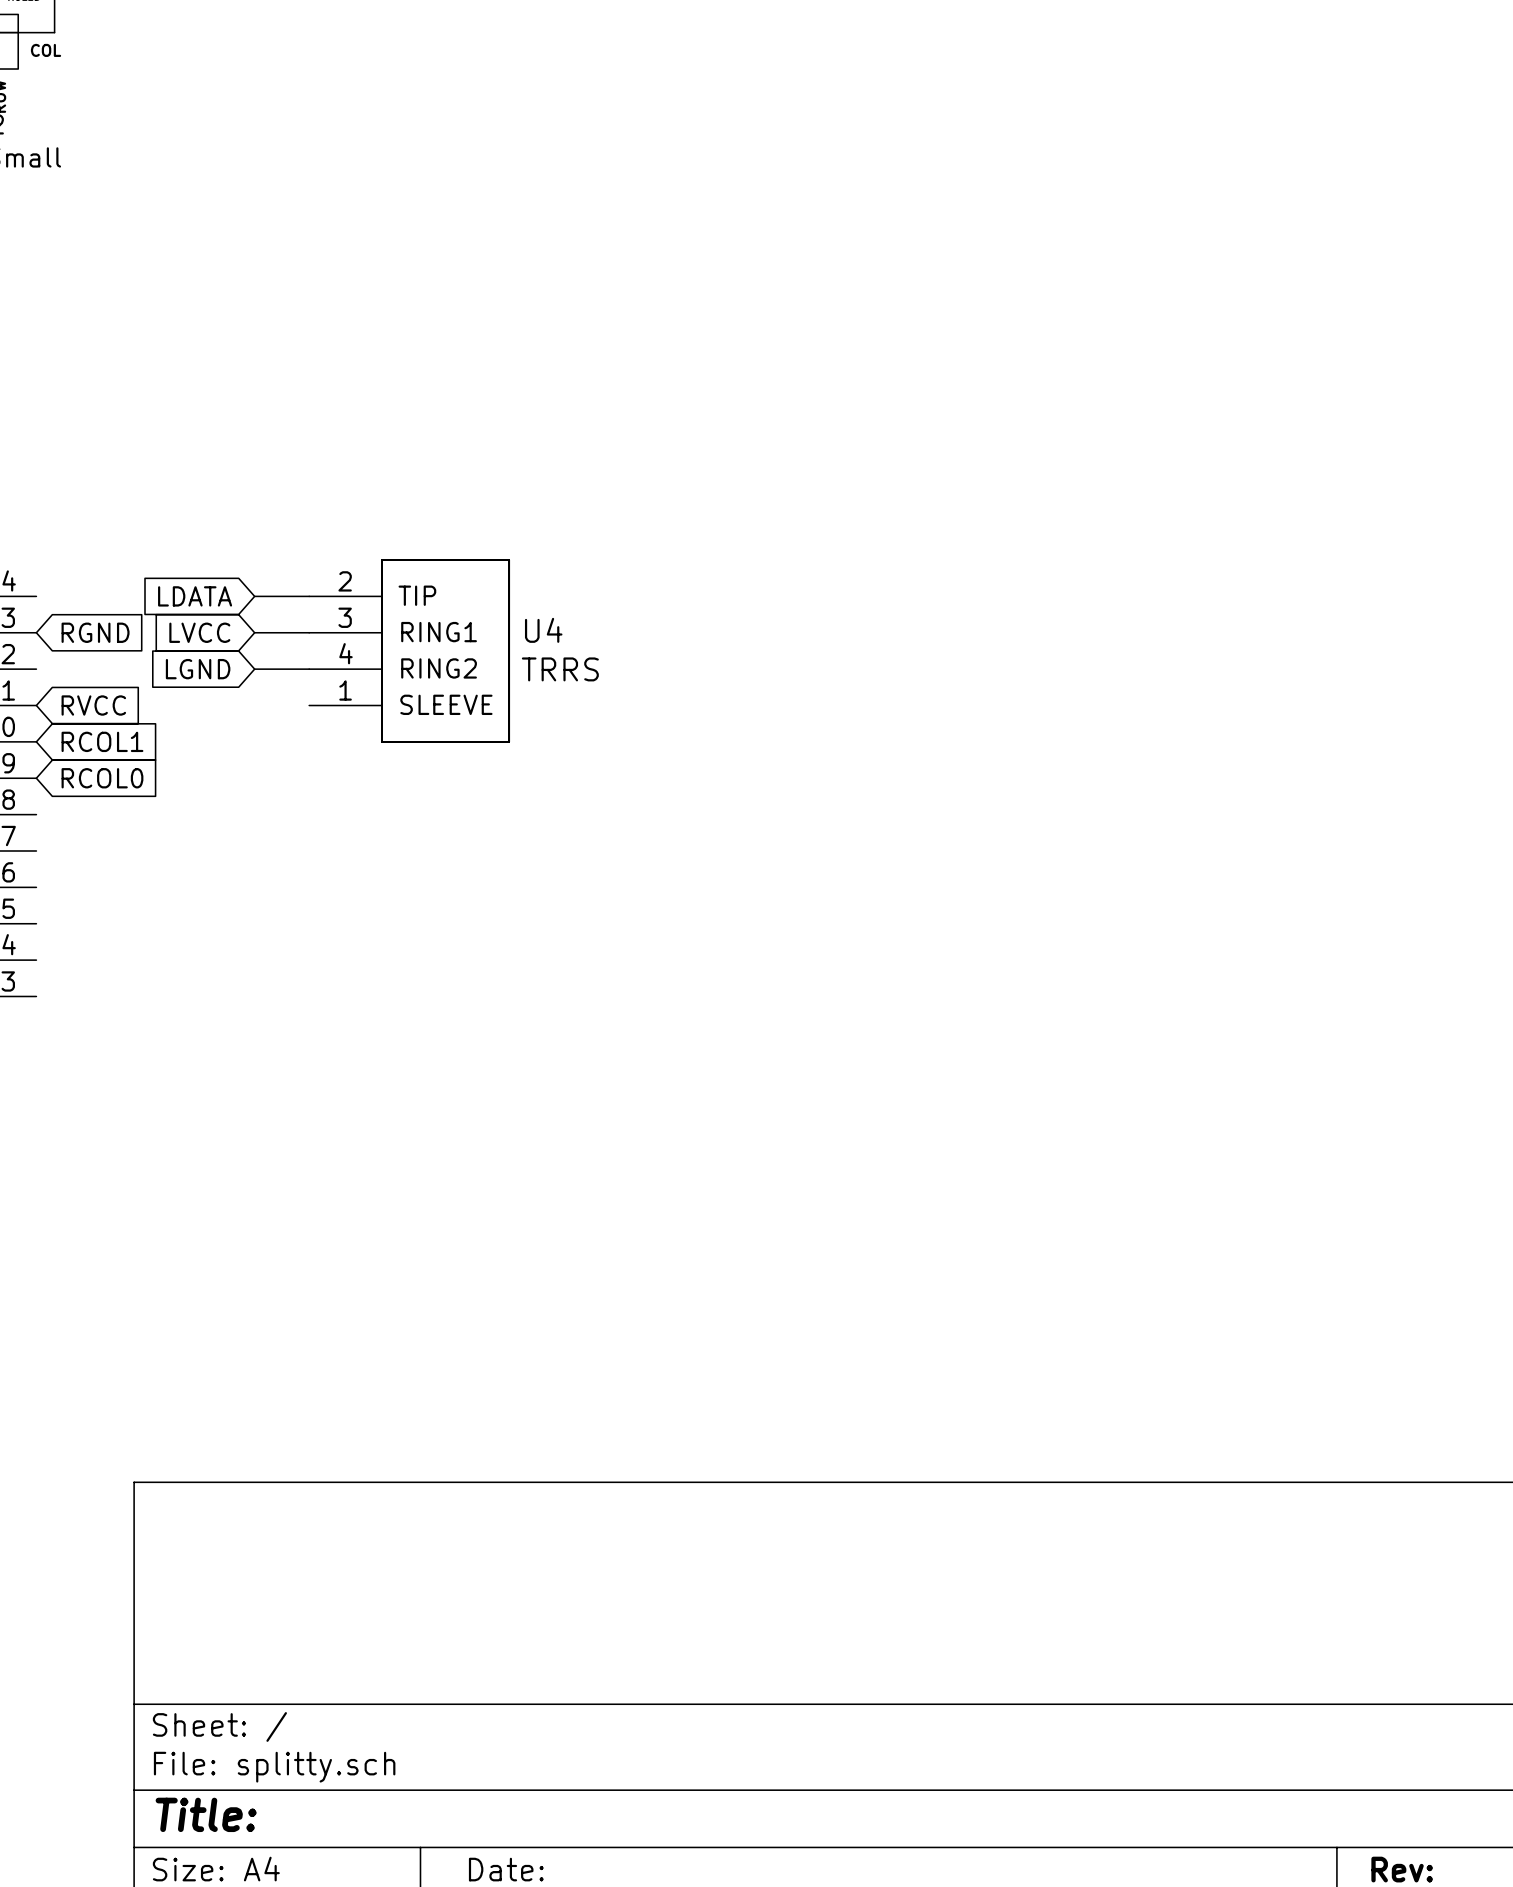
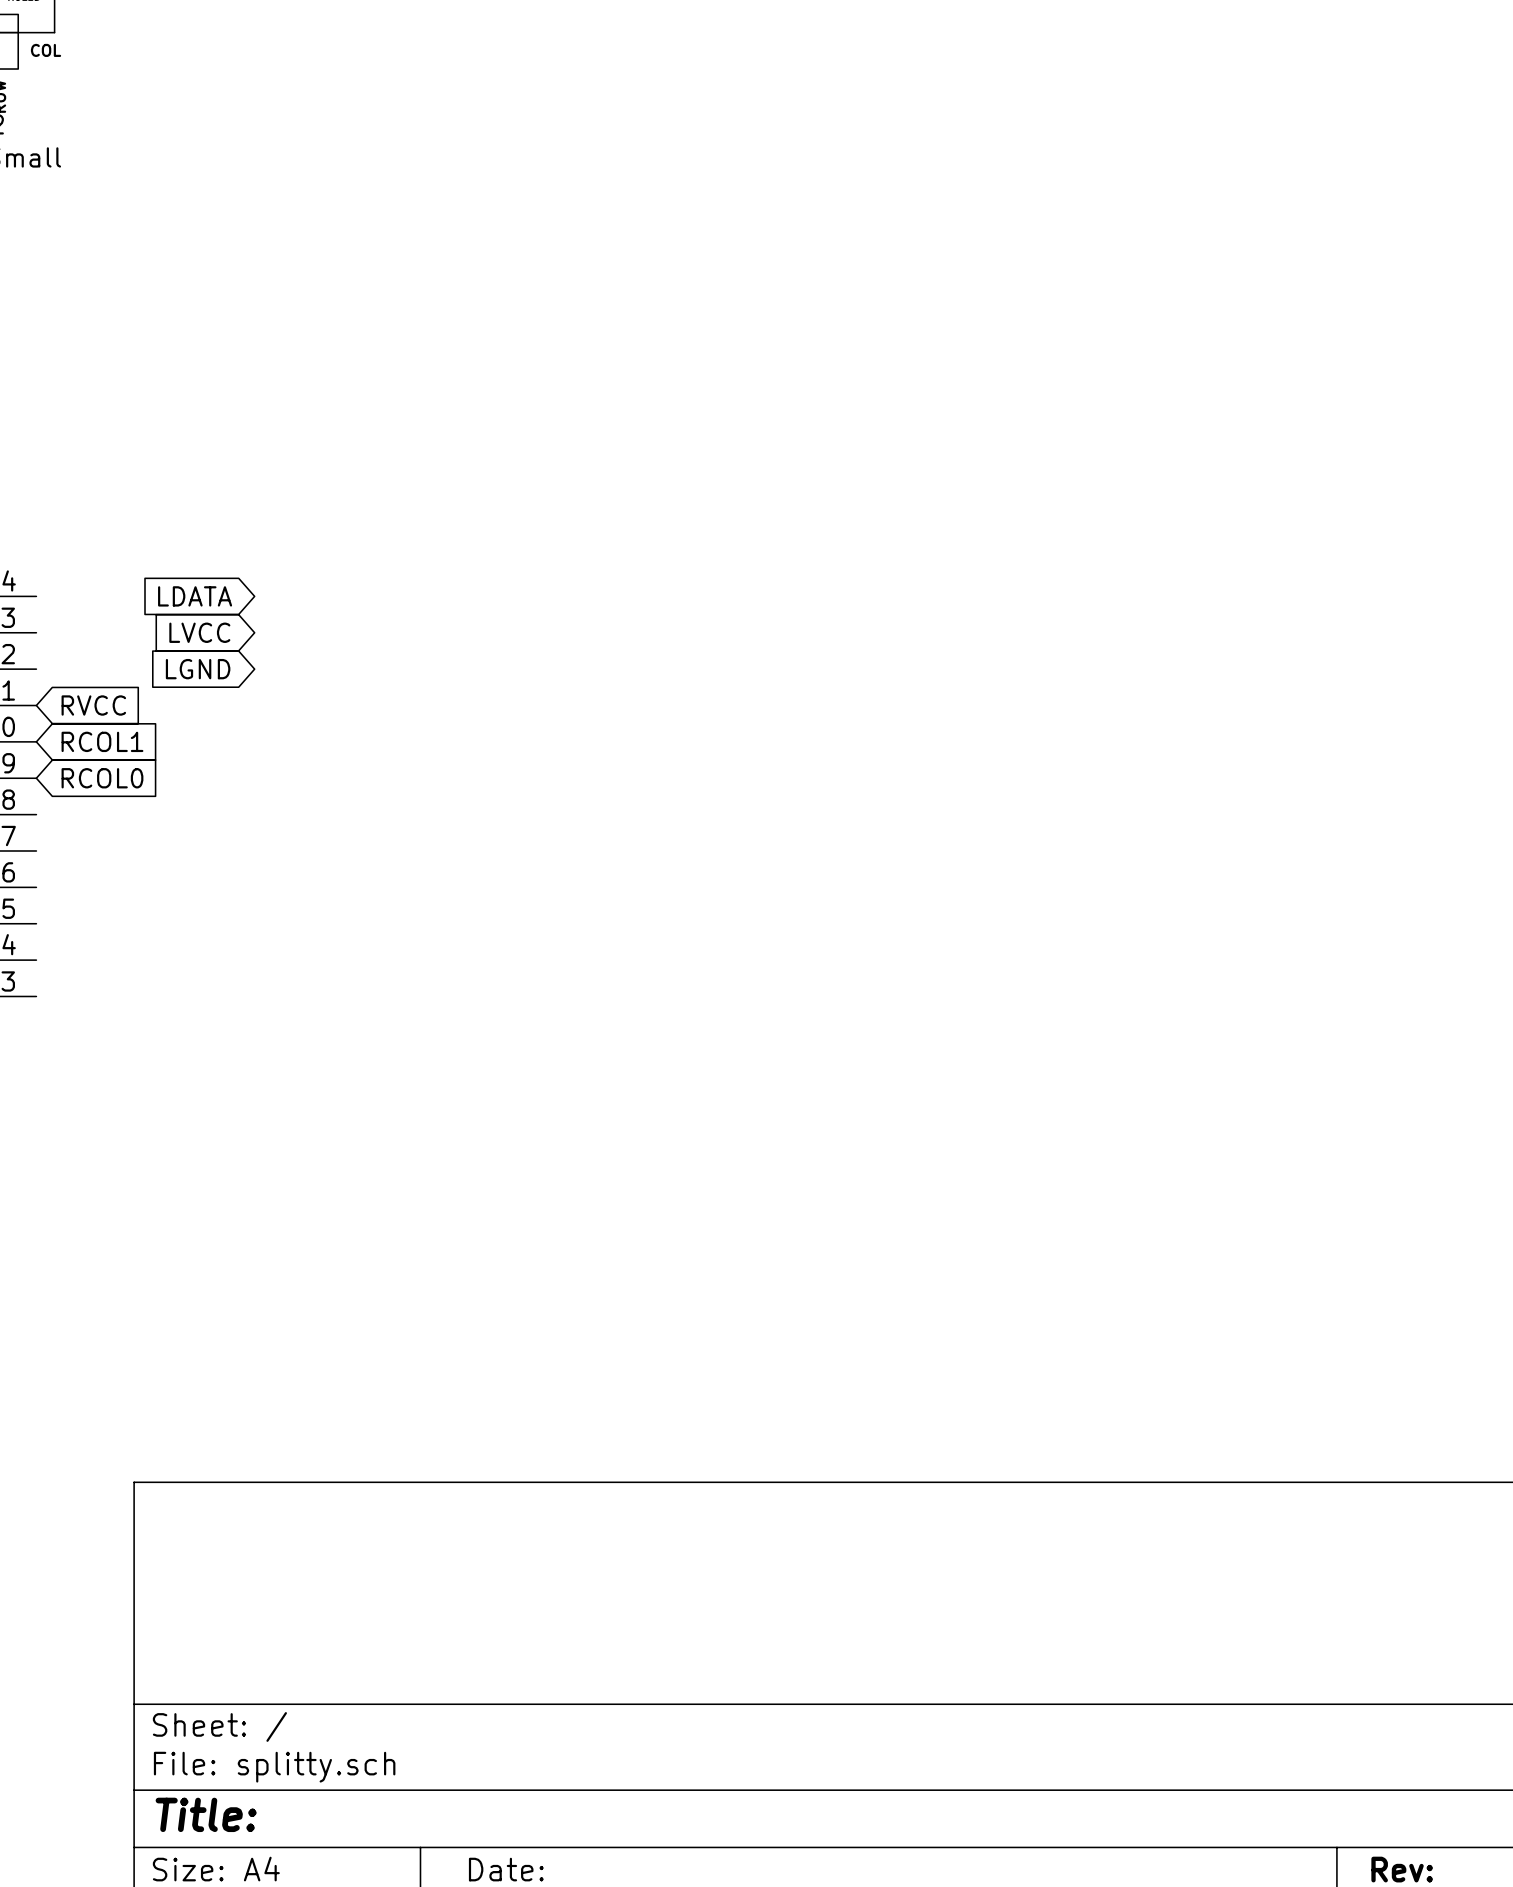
wire: (254, 596) (309, 596) -> none
global label: RGND (95, 632) -> none
wire: (254, 632) (309, 632) -> none
U4: TRRS (409, 650) -> none
wire: (254, 669) (309, 669) -> none

